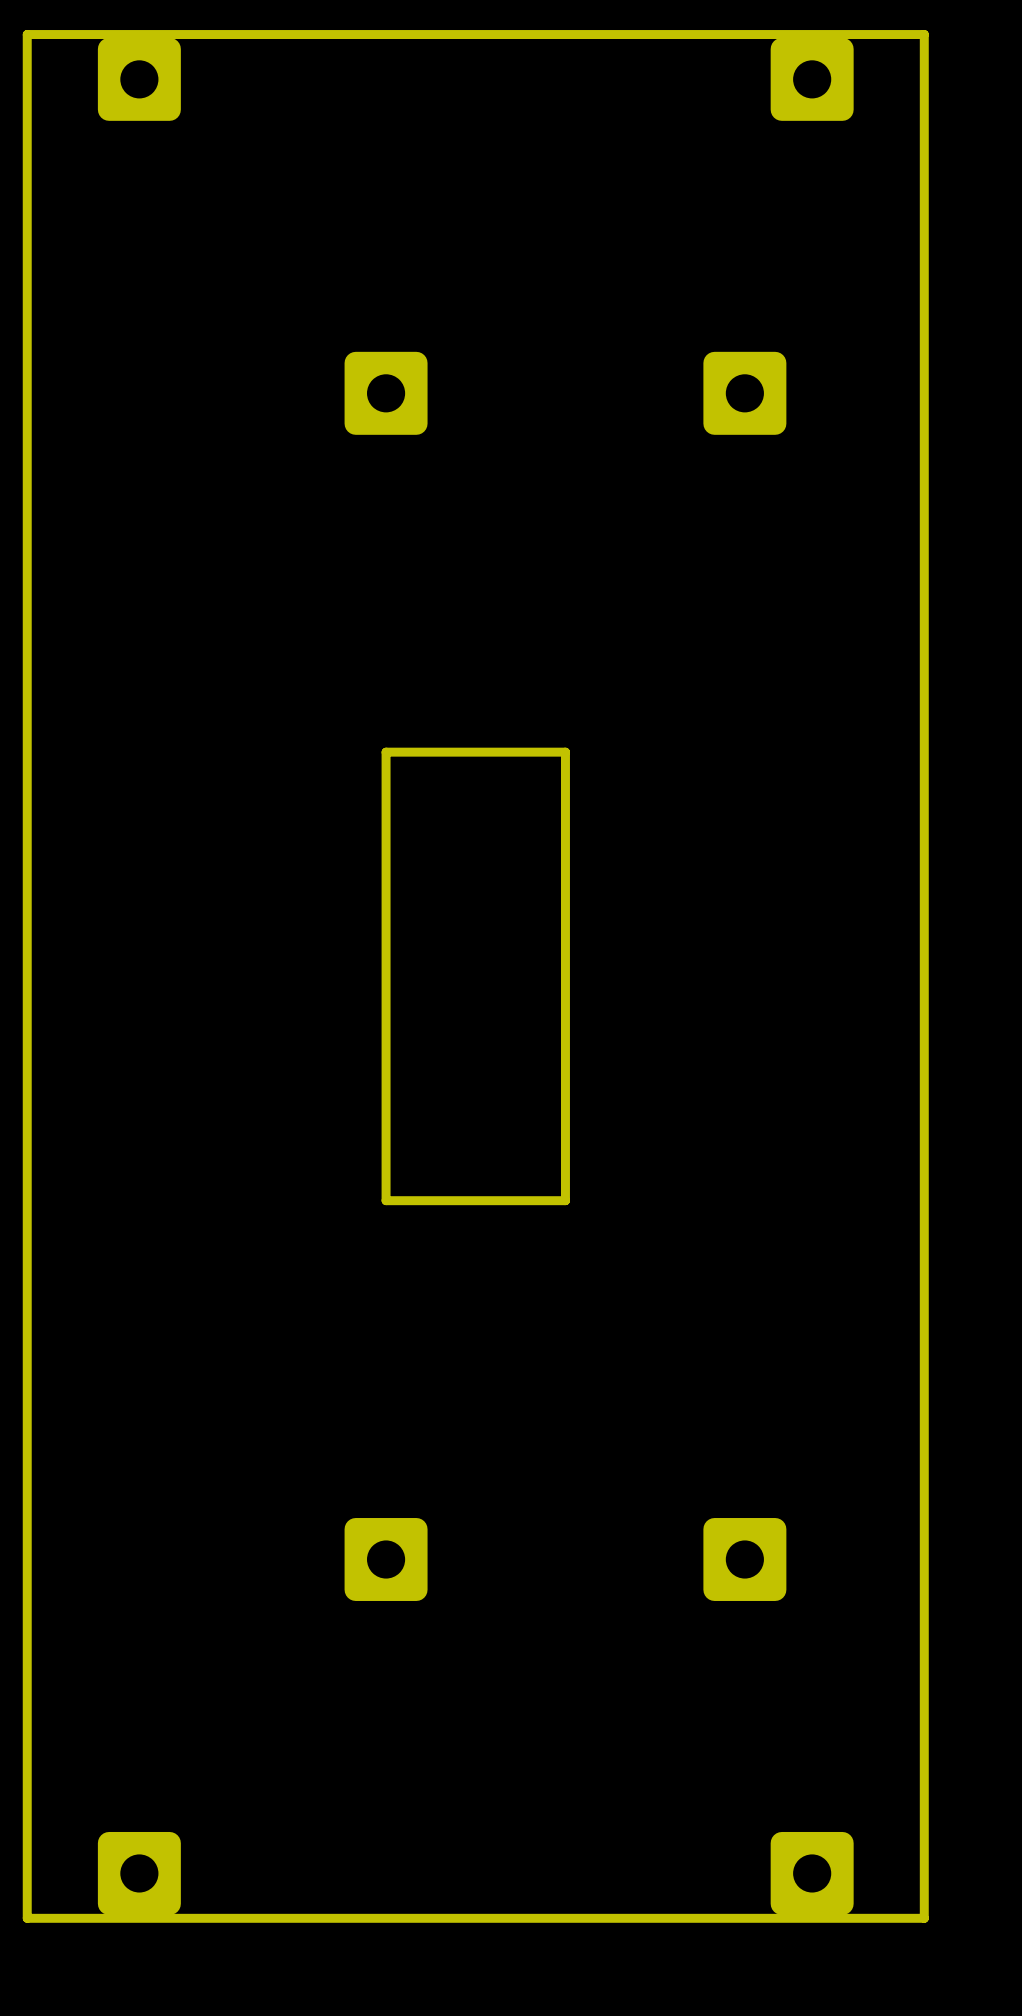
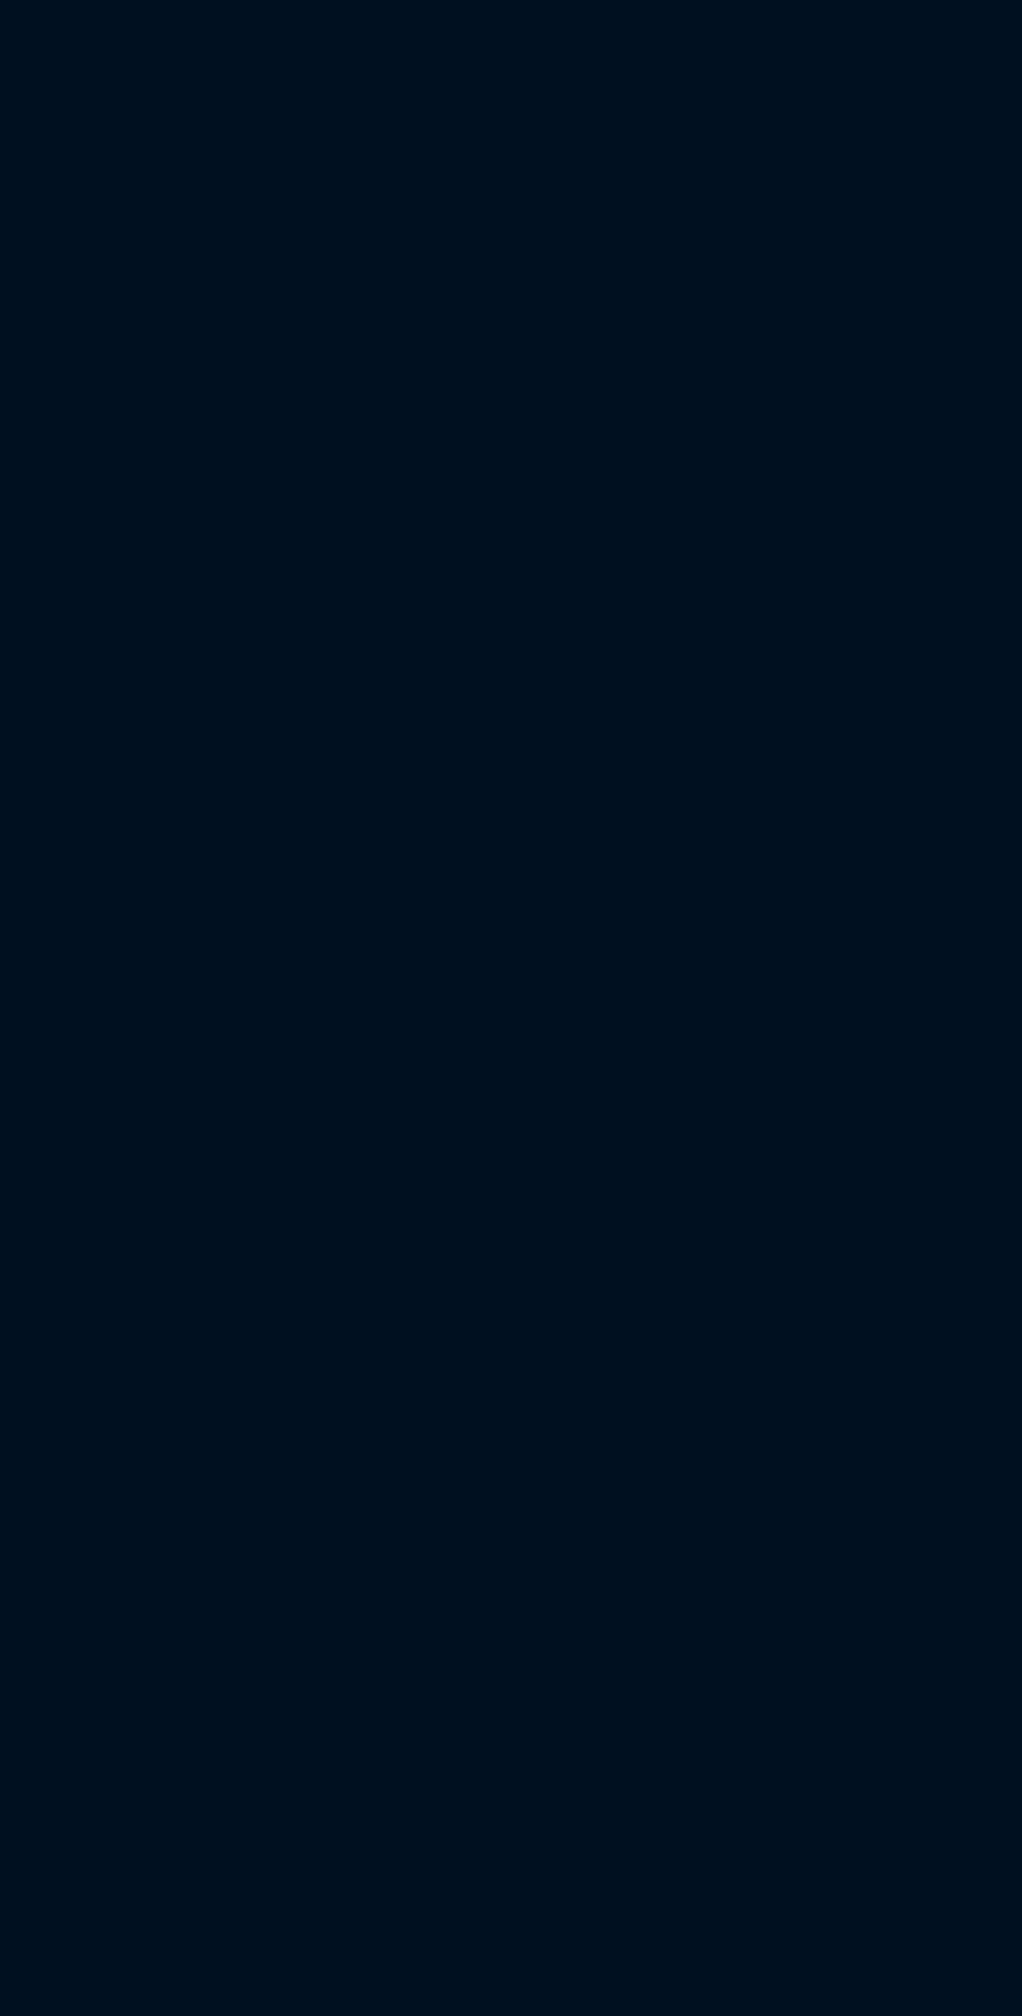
board edge: (924, 34) (27, 34) (27, 1918) (924, 1918) (924, 34) -> none
part: (139, 79) -> none
part: (812, 79) -> none
part: (386, 393) -> none
part: (744, 393) -> none
board edge: (565, 752) (386, 752) (386, 1200) (565, 1200) (565, 752) -> none
part: (386, 1559) -> none
part: (744, 1559) -> none
part: (139, 1873) -> none
part: (812, 1873) -> none

